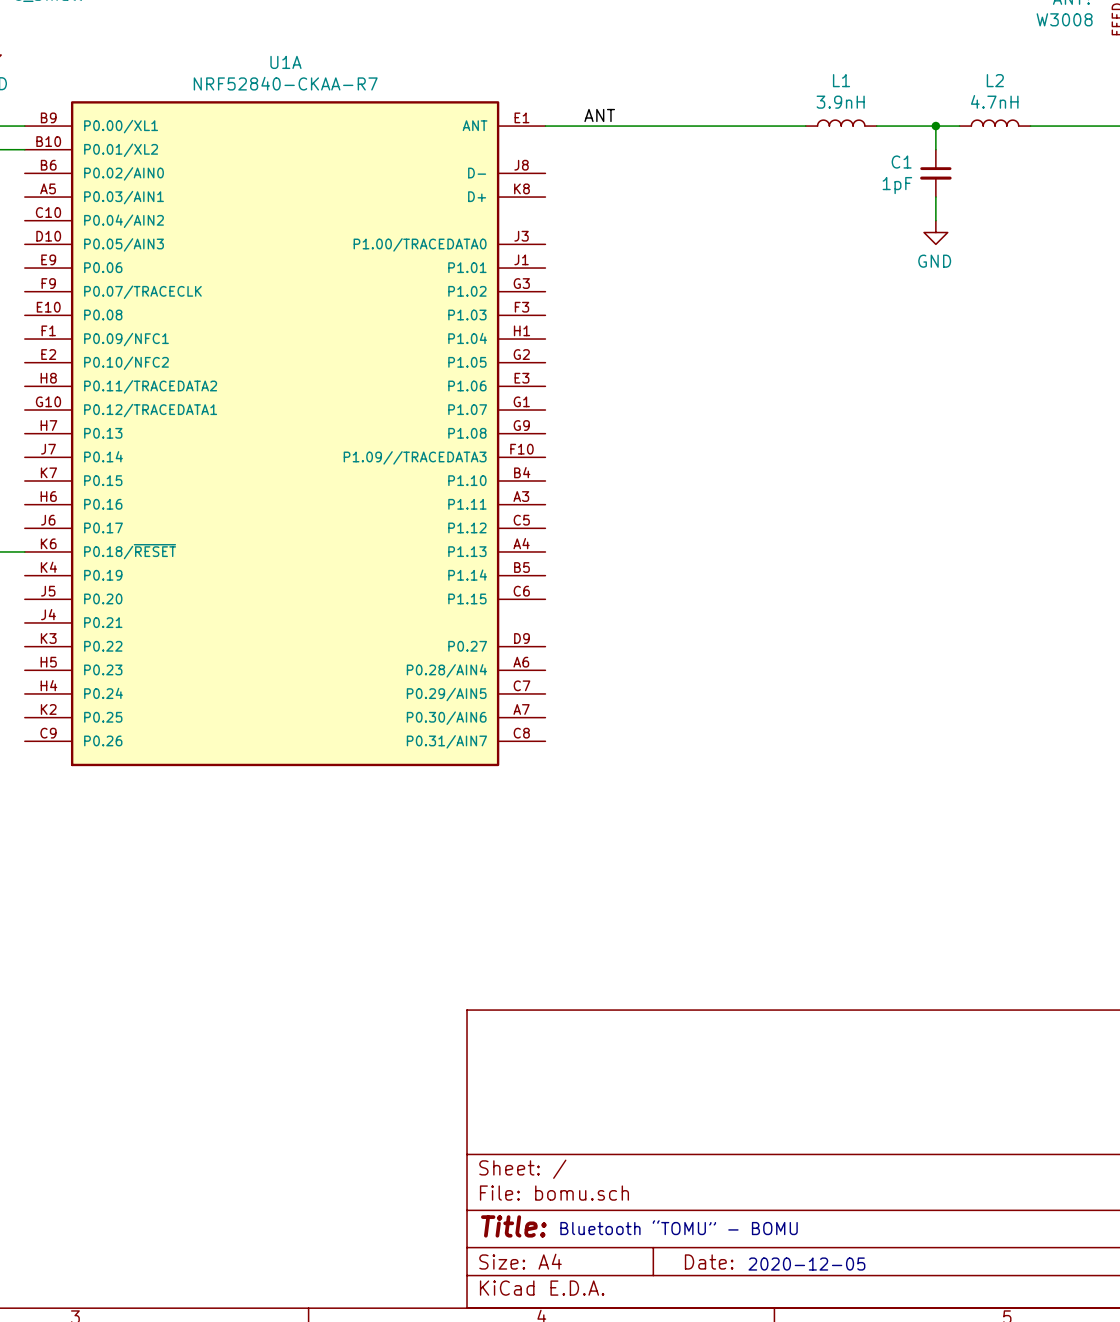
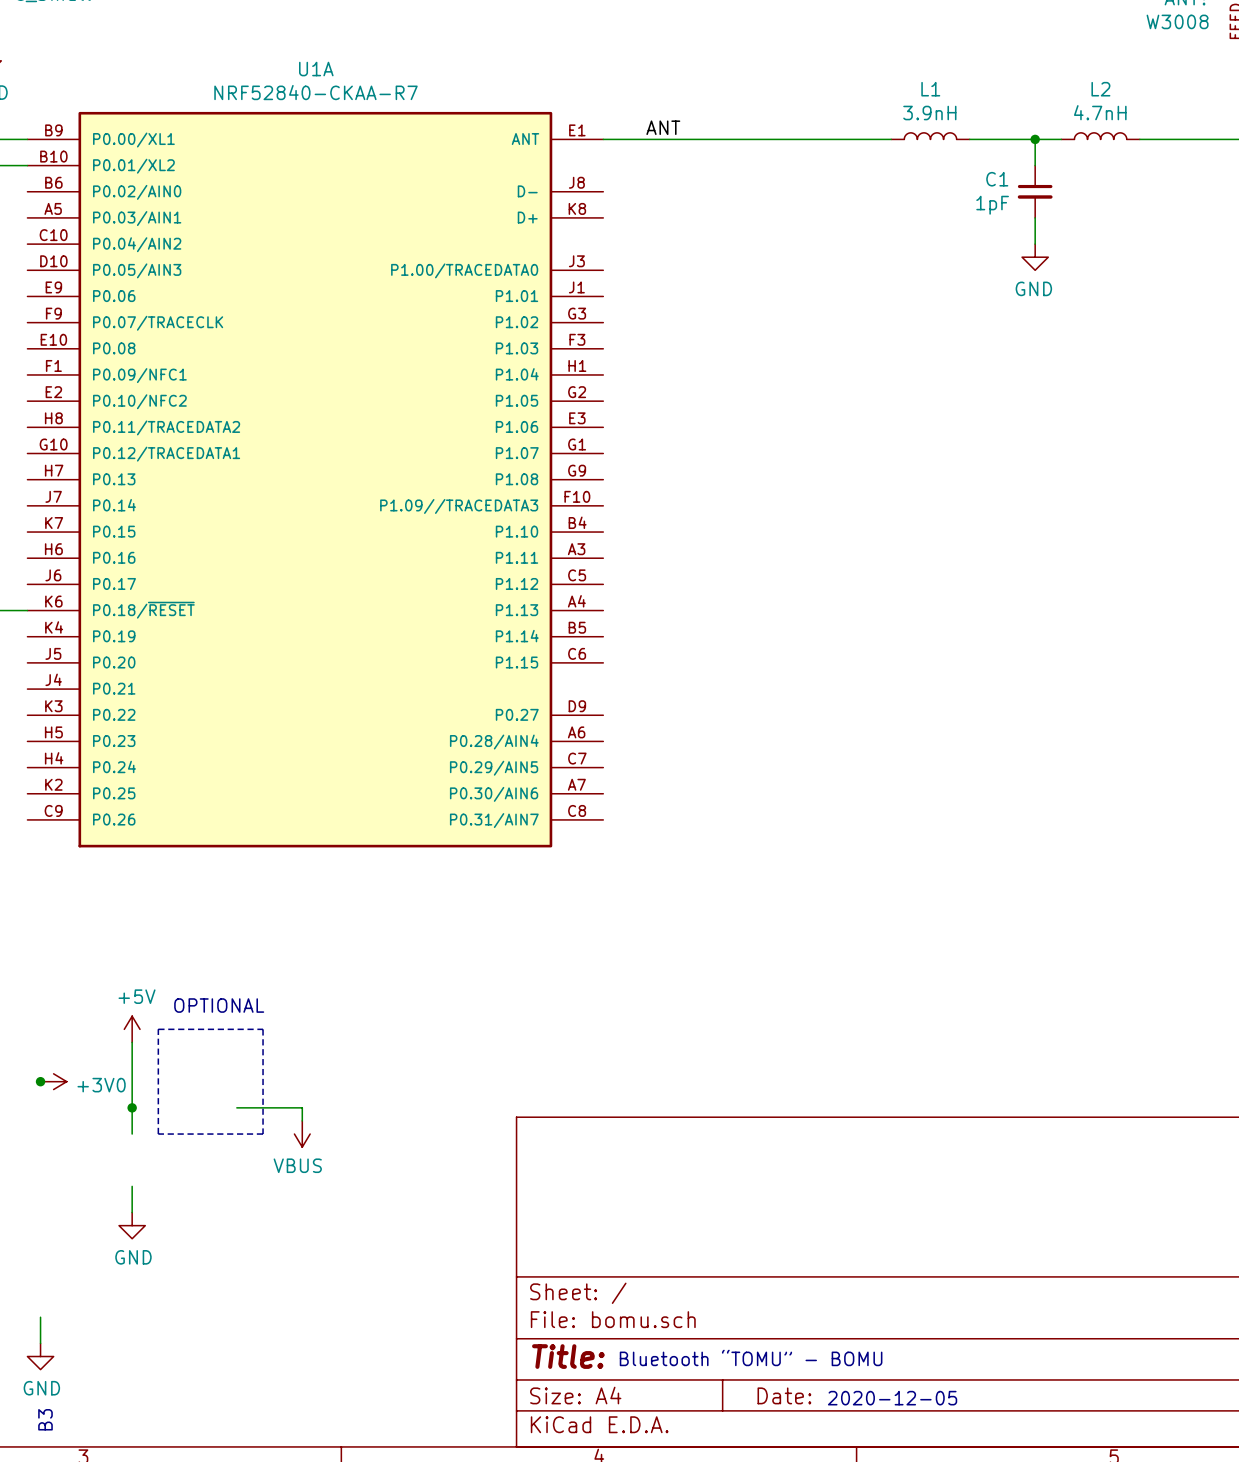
text: none -> OPTIONAL (219, 1005)
power symbol: none -> +5V (132, 1029)
line: none -> (158, 1029) (158, 1134) (263, 1134) (263, 1029) (158, 1029)
wire: none -> (132, 1042) (132, 1134)
junction: none -> (40, 1081)
power symbol: none -> +3V0 (53, 1081)
junction: none -> (132, 1107)
wire: none -> (236, 1107) (302, 1107) (302, 1120)
power symbol: none -> VBUS (302, 1134)
wire: none -> (132, 1186) (132, 1212)
power symbol: none -> GND (132, 1225)
wire: none -> (40, 1317) (40, 1343)
power symbol: none -> GND (40, 1356)
text: none -> B3 (45, 1419)

